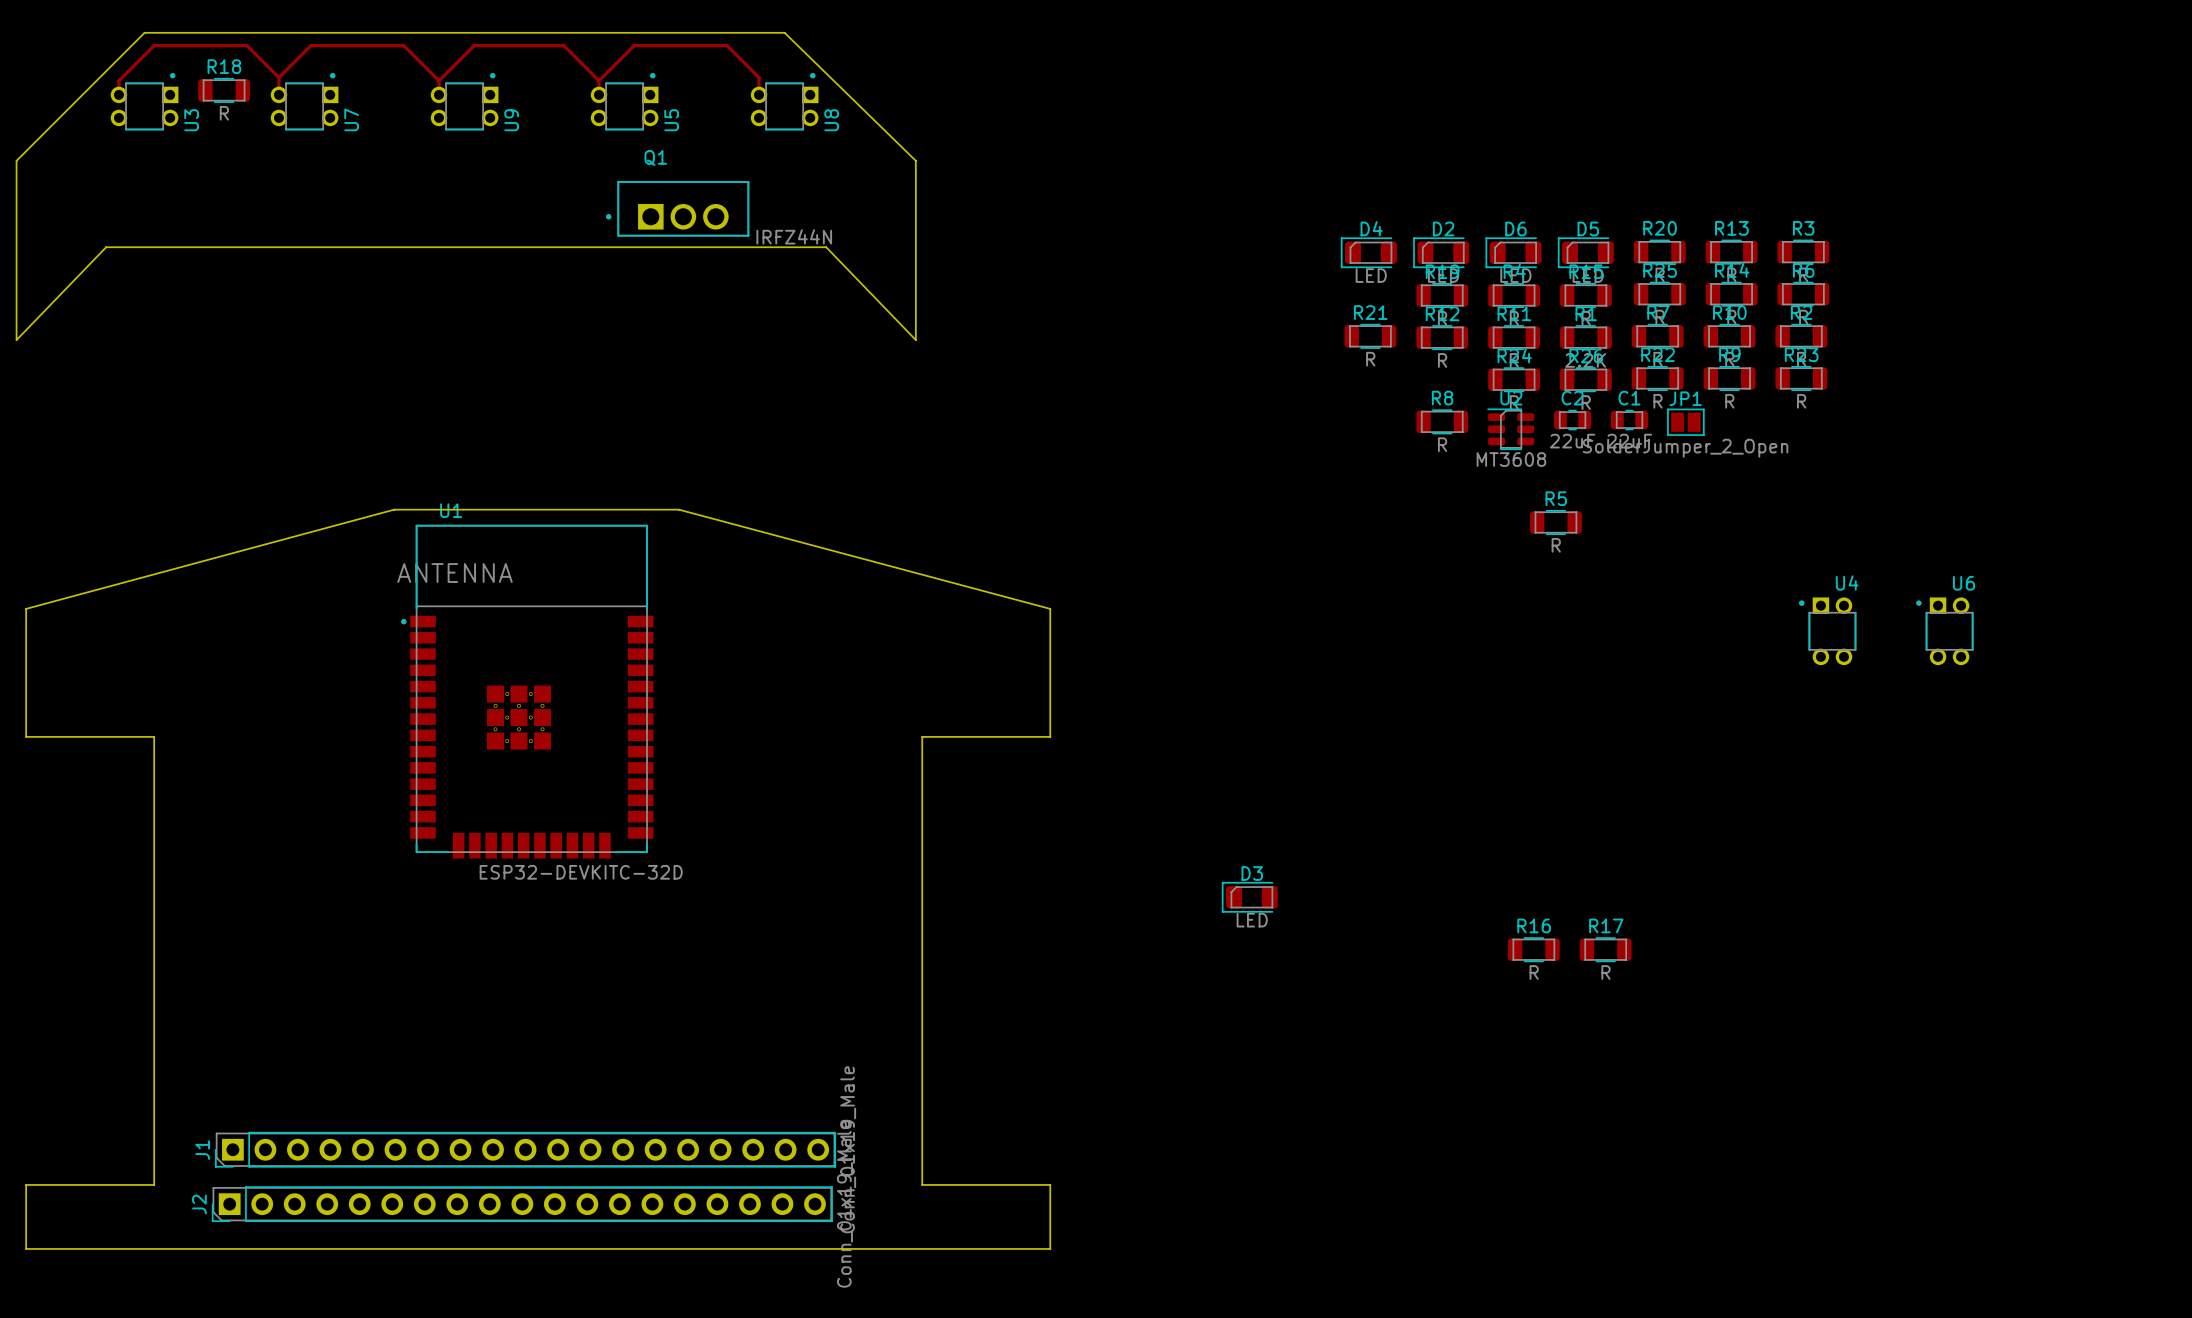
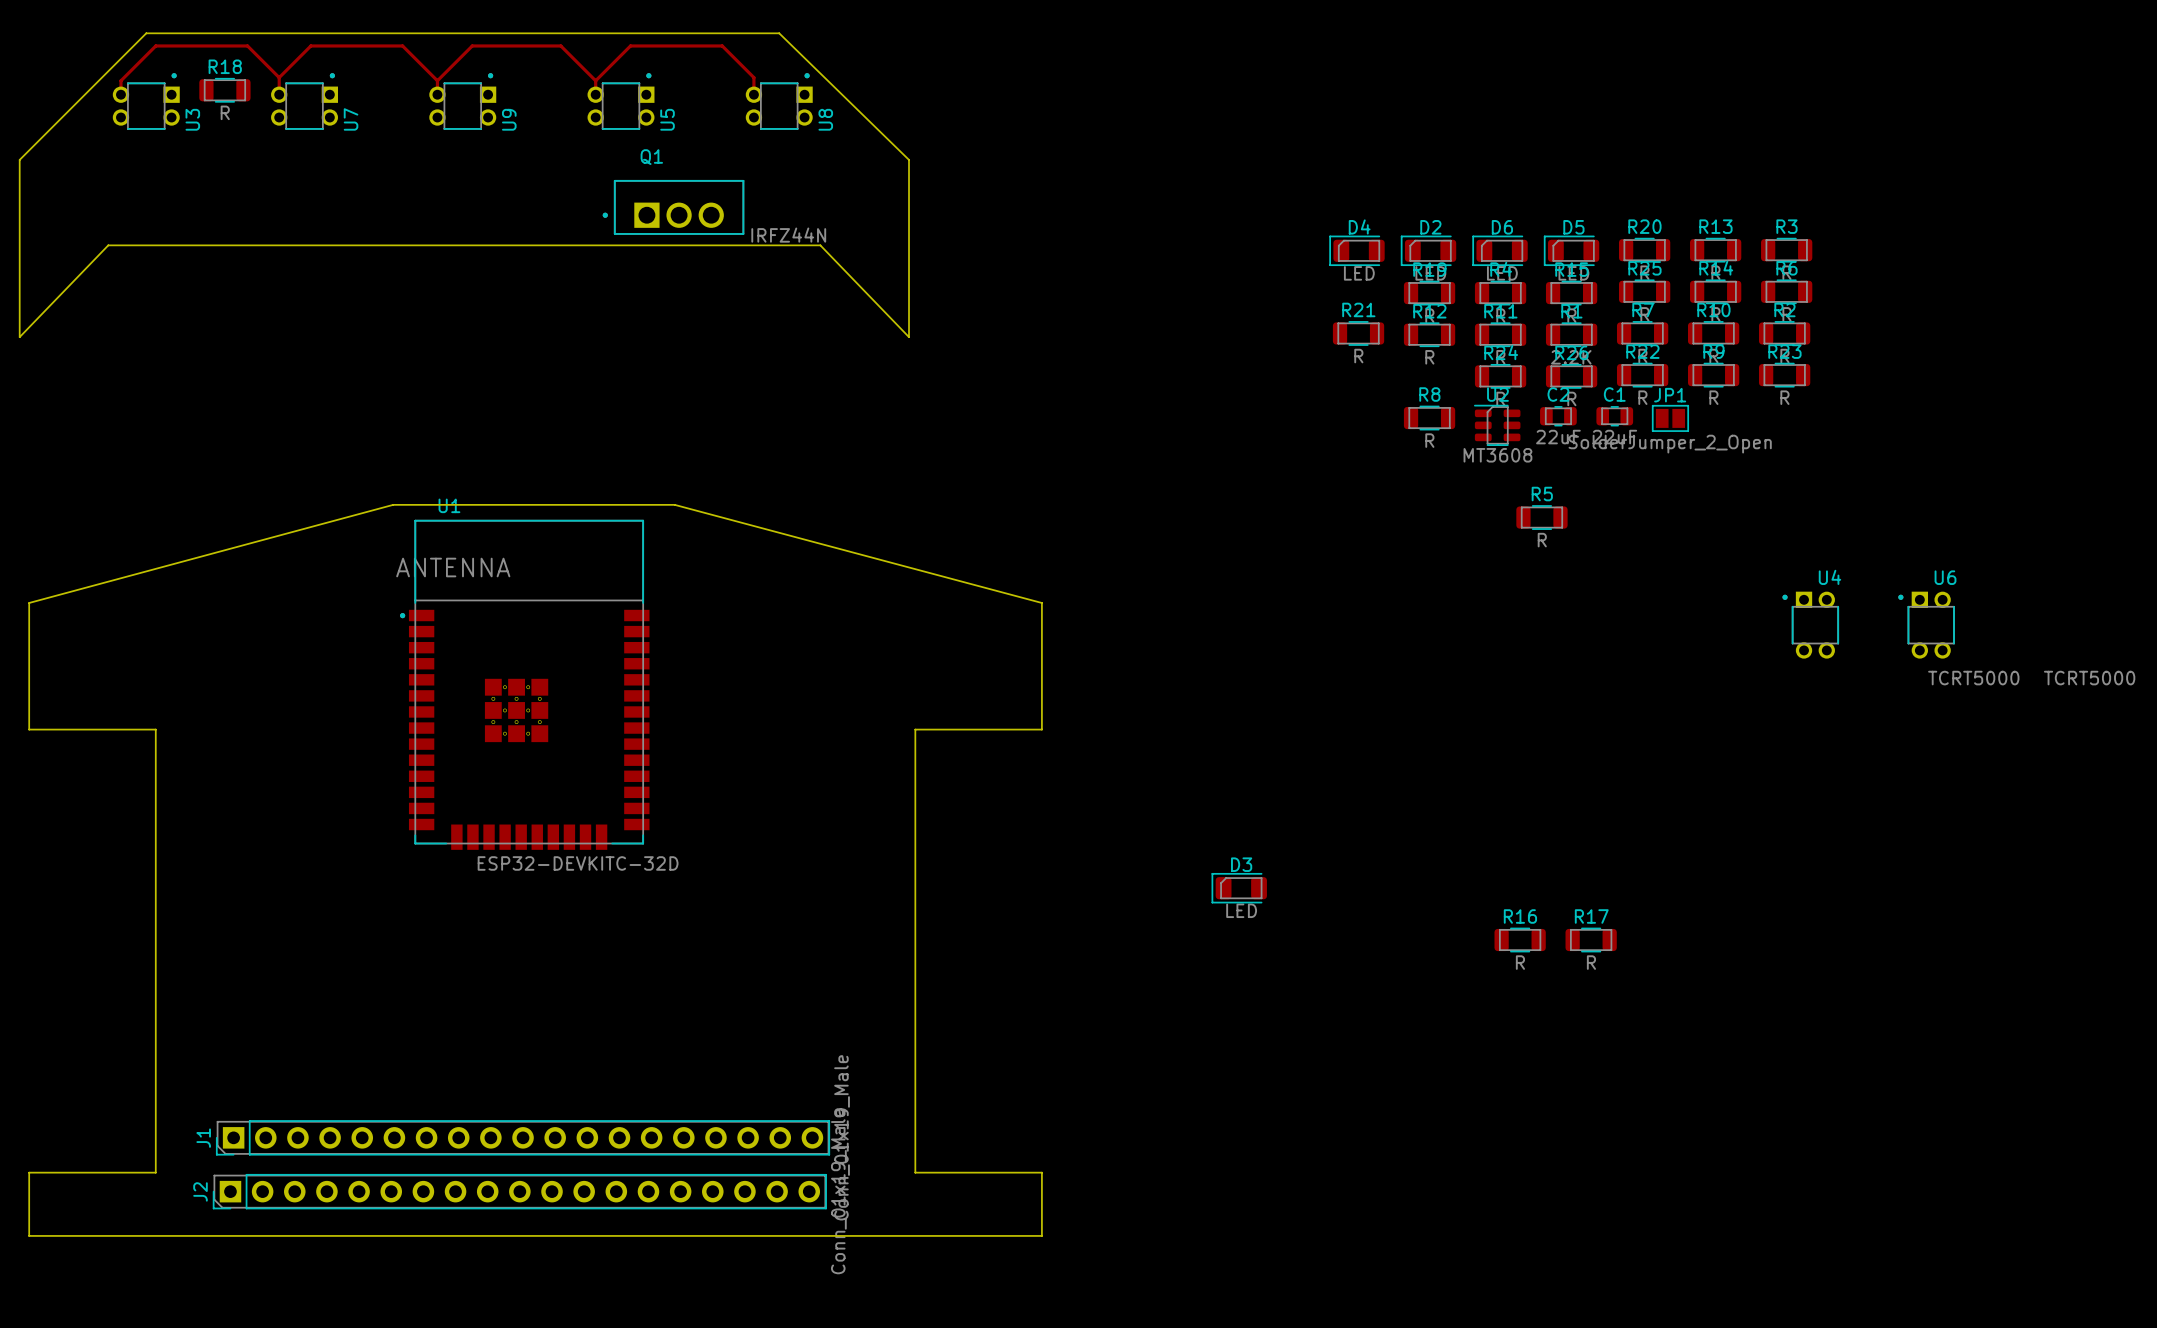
U4 value: none -> TCRT5000 (1973, 678)
U6 value: none -> TCRT5000 (2089, 678)

